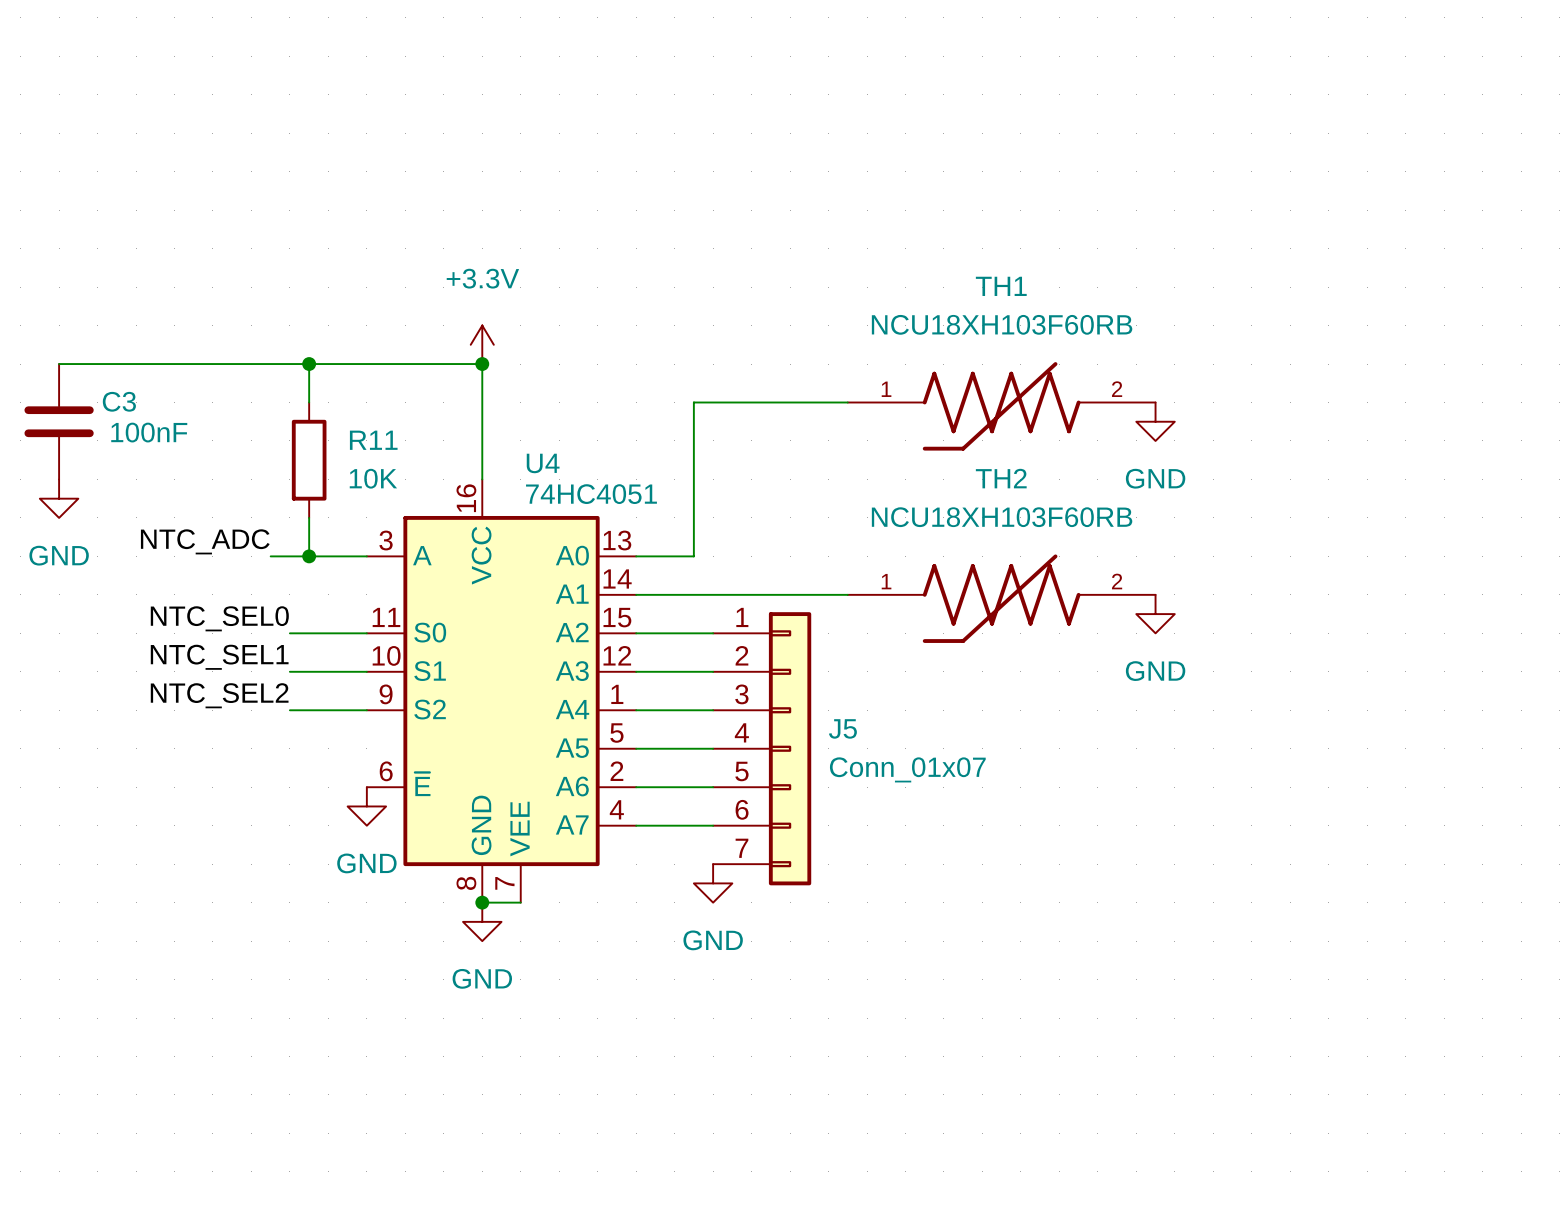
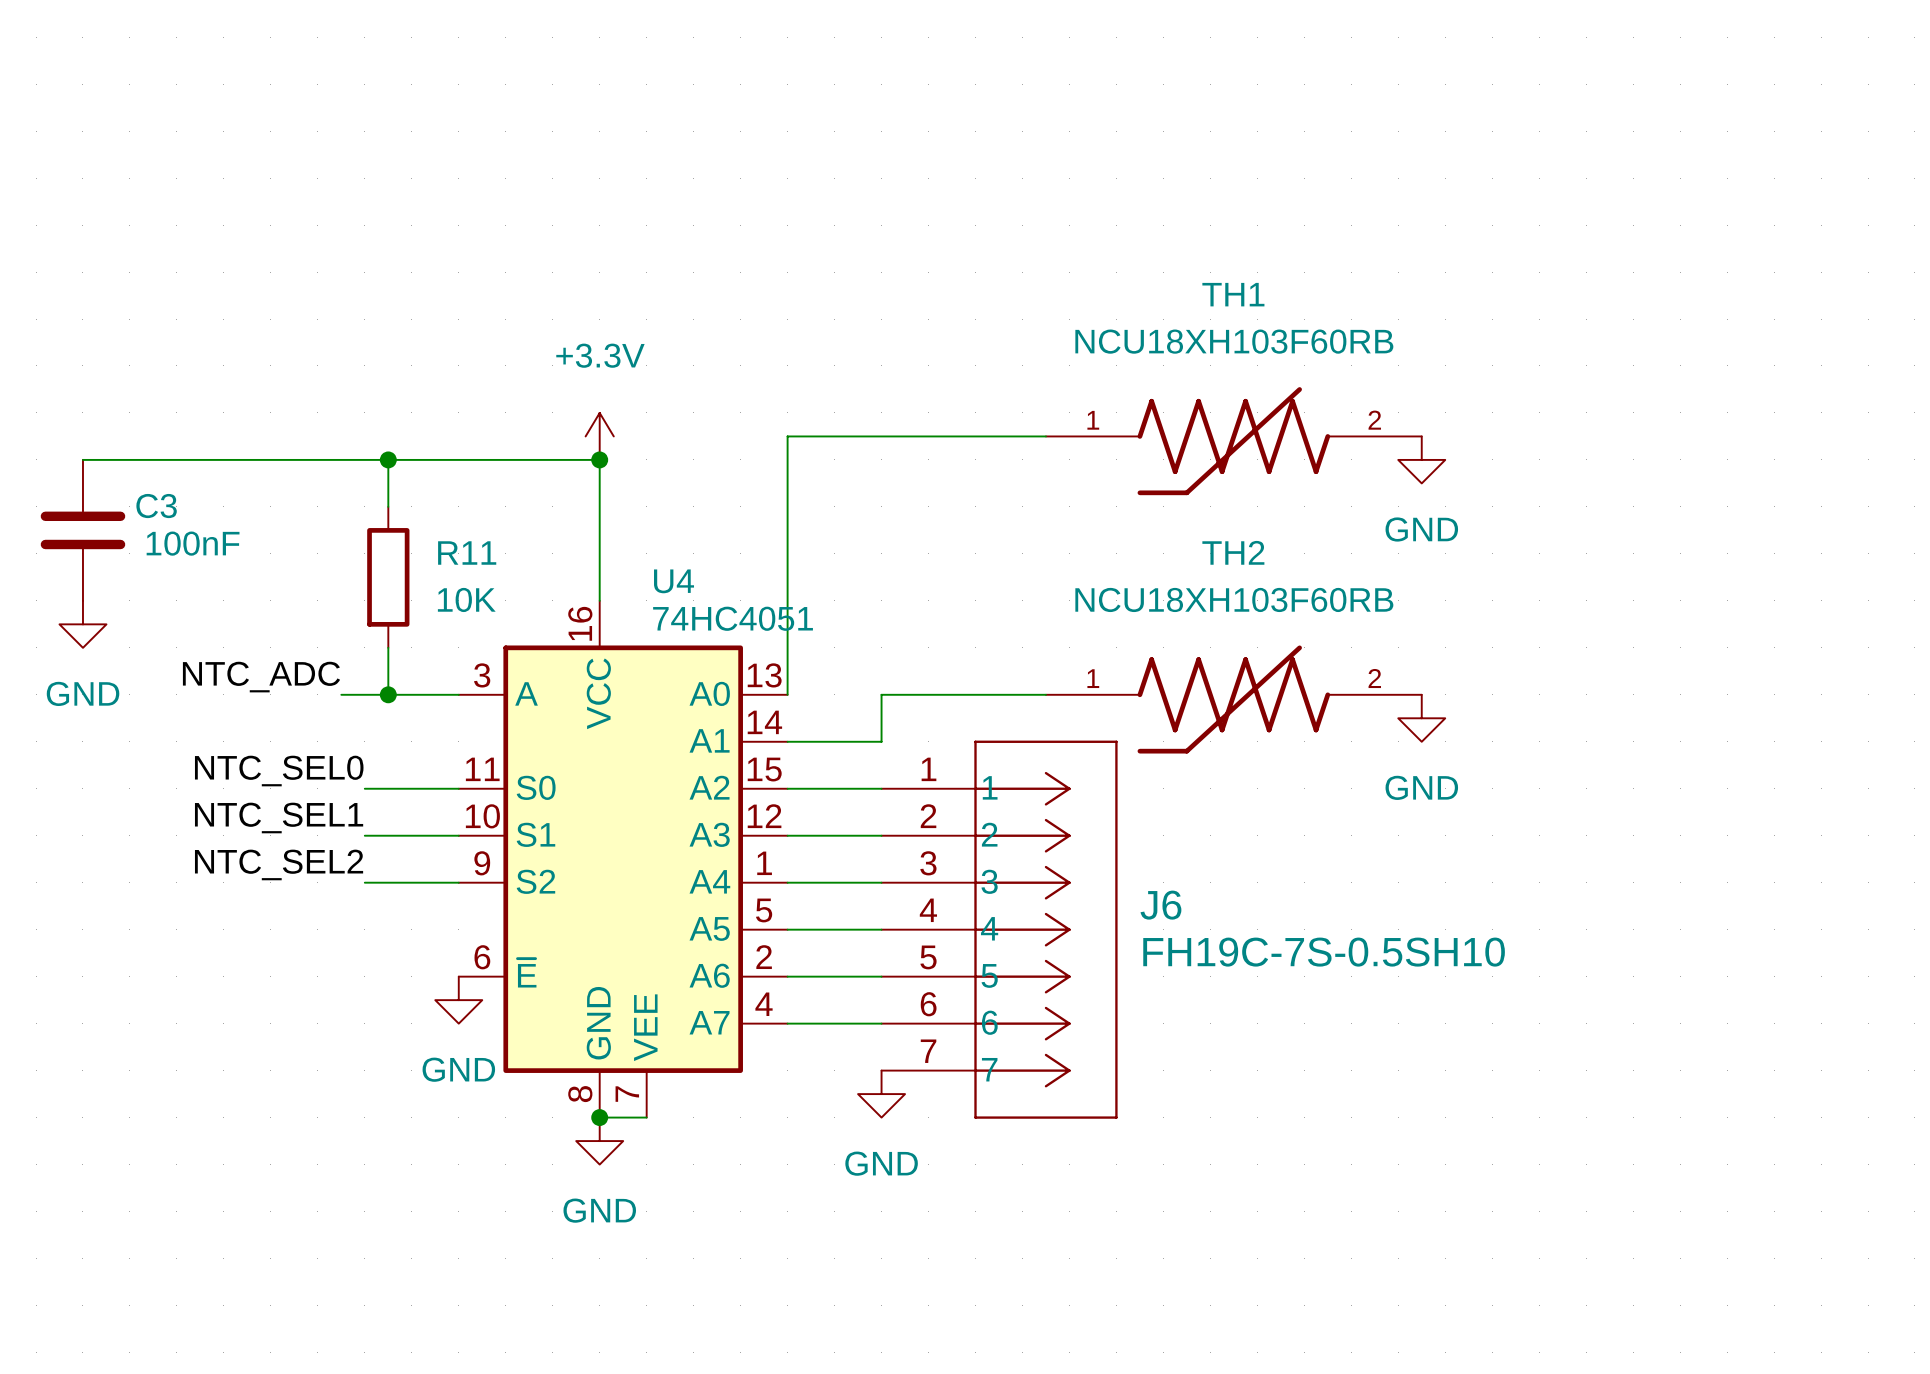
wire: (847, 402) (693, 402) (693, 556) (636, 556) -> (1045, 436) (787, 436) (787, 694)
TH1 position: (1001, 406) -> (1233, 441)
power symbol position: GND (1155, 421) -> GND (1421, 459)
wire: (713, 594) (847, 594) -> (881, 741) (881, 694) (1045, 694)
TH2 position: (1001, 598) -> (1233, 699)
power symbol position: GND (1155, 614) -> GND (1421, 718)
J5: Conn_01x07 (762, 748) -> none
J6: none -> FH19C-7S-0.5SH10 (999, 929)

